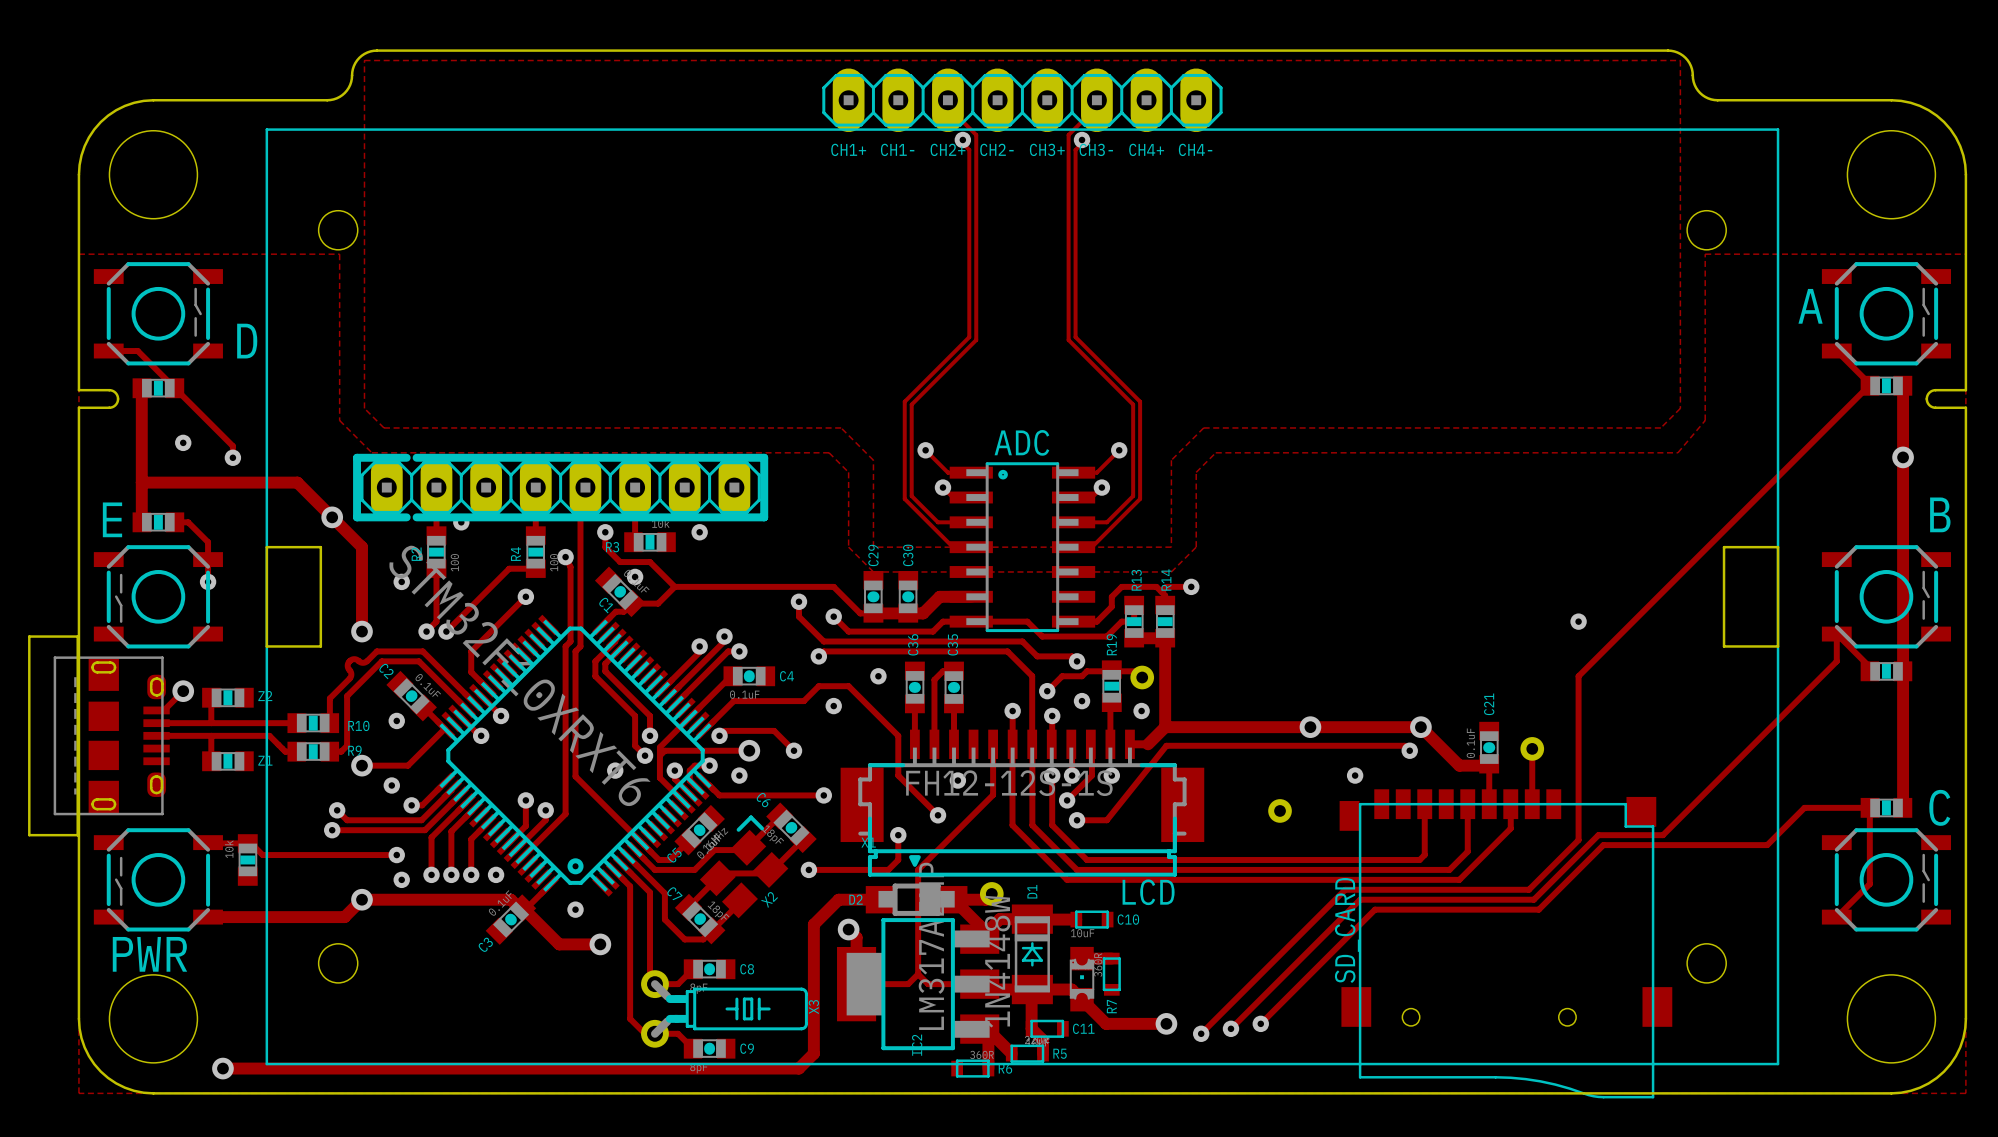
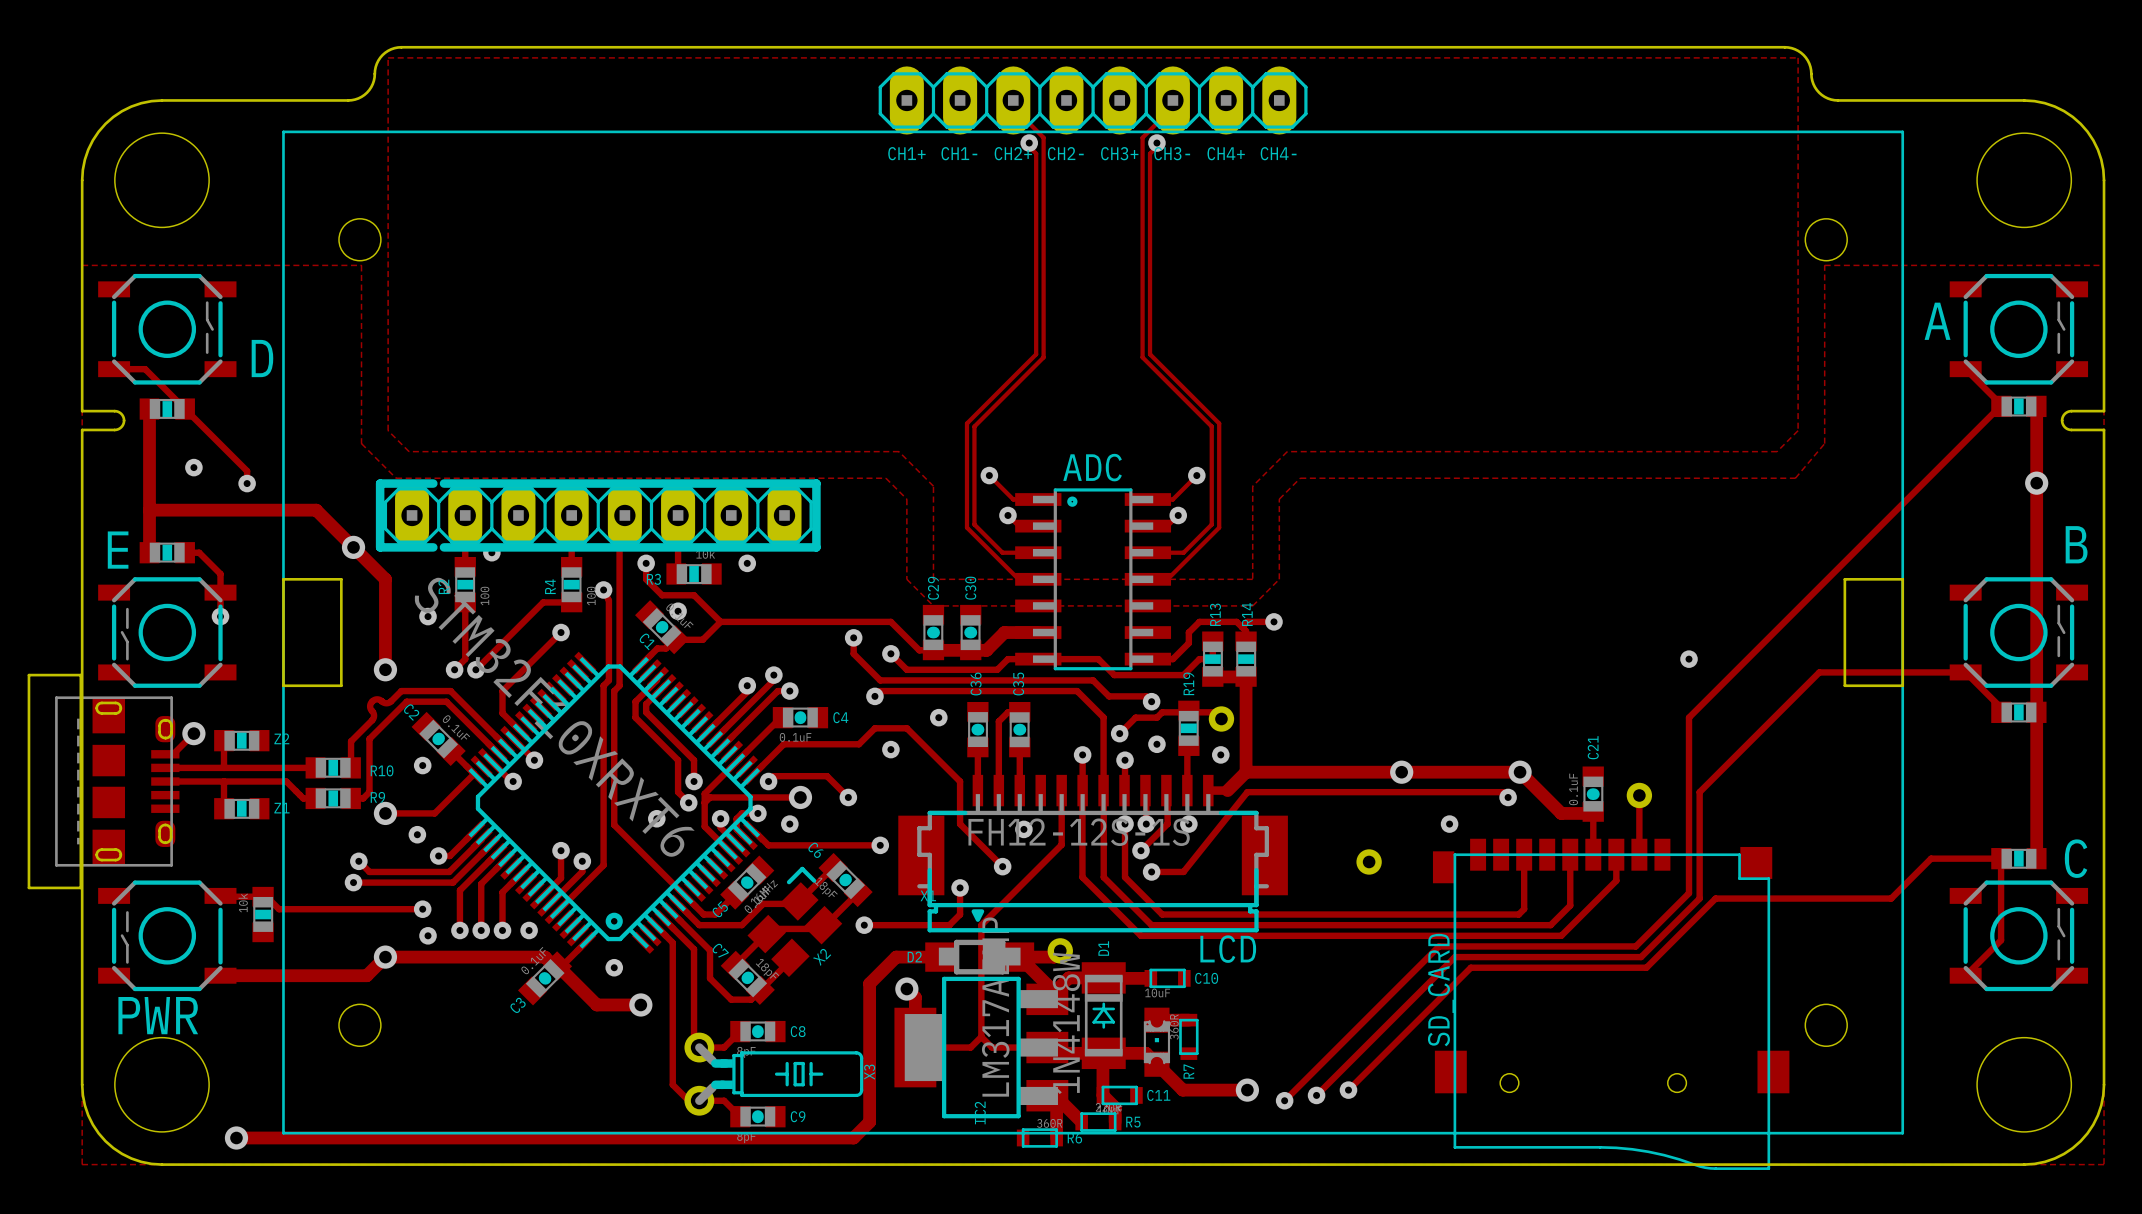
track: (1836, 634) (1836, 661) (1662, 835) (1598, 835) (1588, 845) -> (1965, 672) (1819, 672) (1699, 792) (1699, 898)

